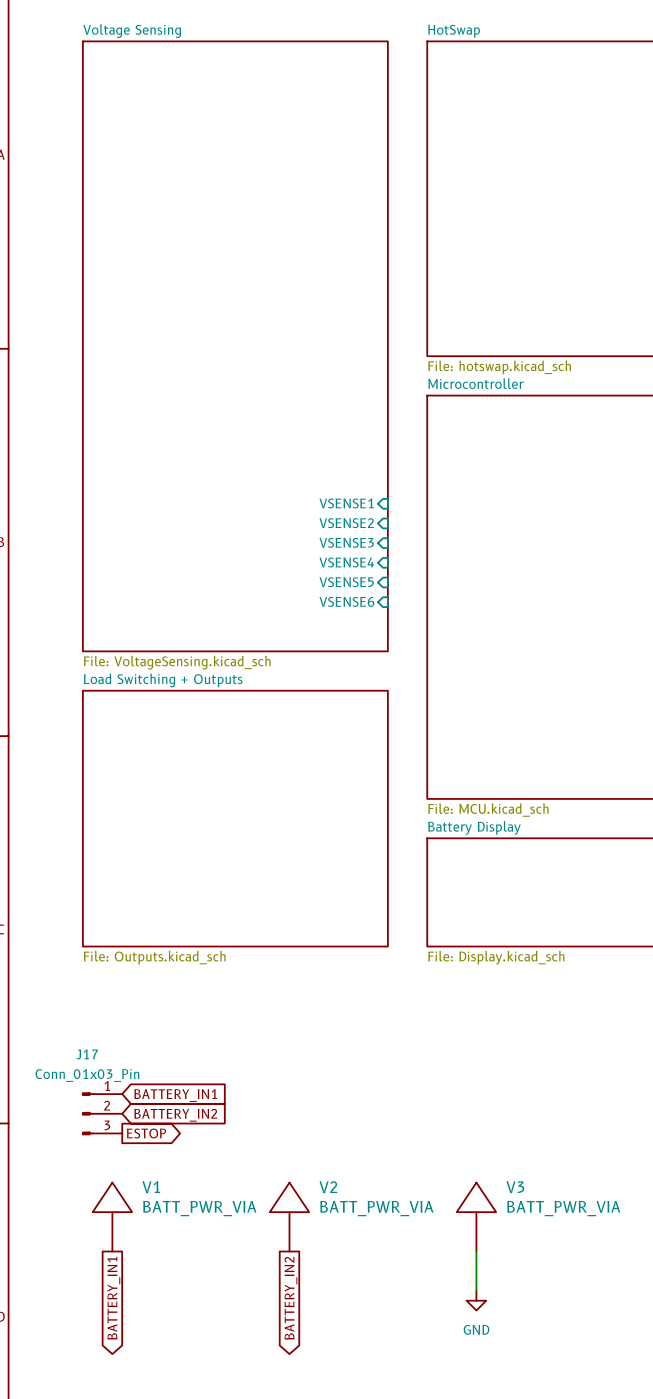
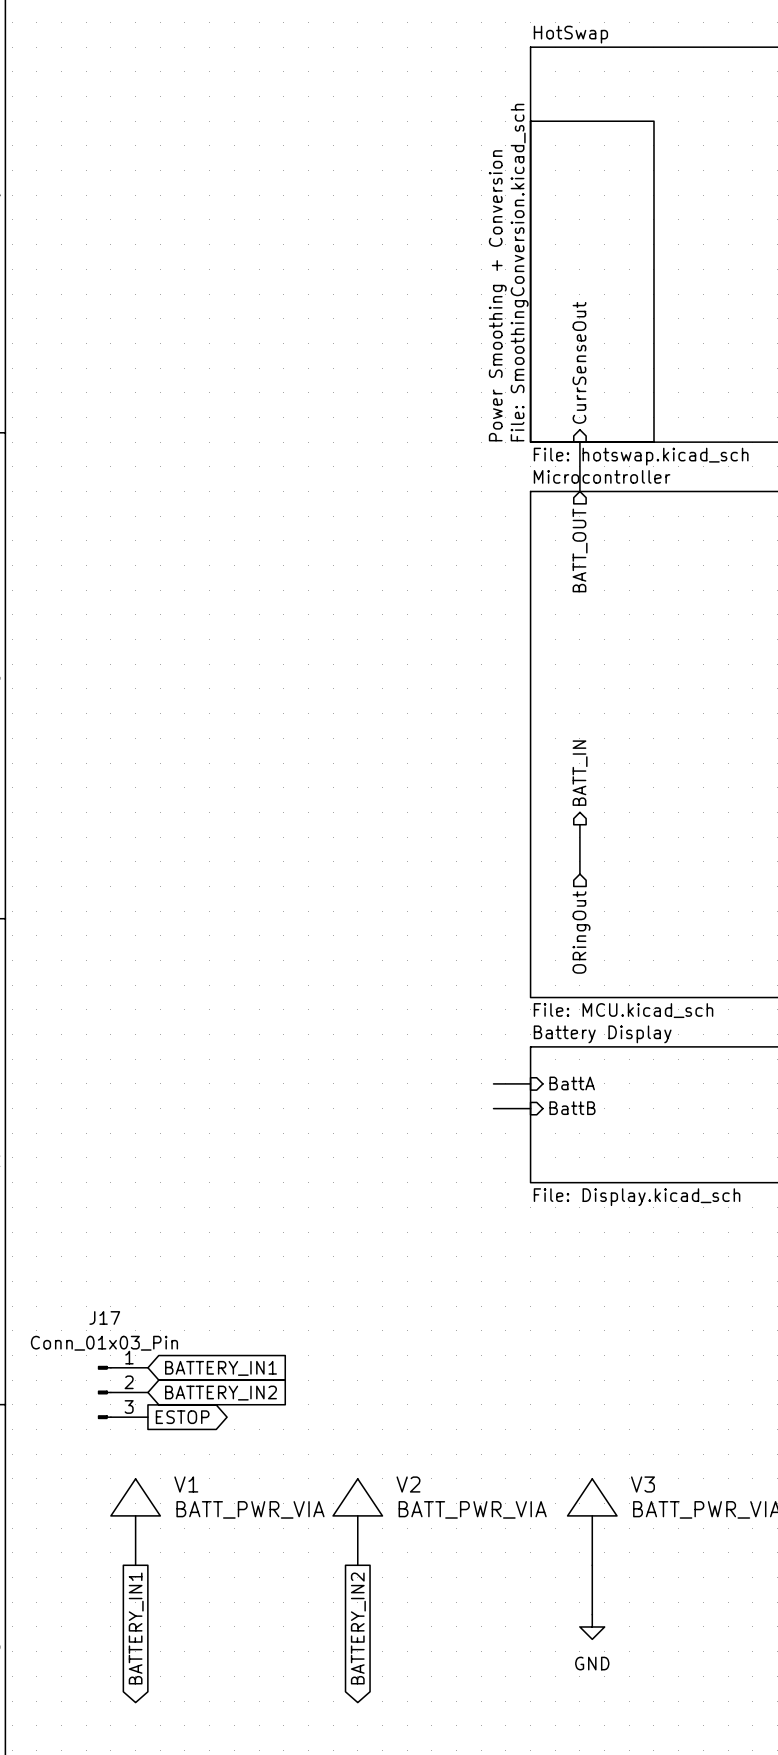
sheet Power Smoothing + Conversion: none -> File: SmoothingConversion.kicad_sch (592, 281)
sheet pin: none -> CurrSenseOut (579, 362)
sheet Voltage Sensing: File: VoltageSensing.kicad_sch (235, 346) -> none
wire: none -> (579, 442) (579, 491)
sheet pin: none -> BATT_OUT (580, 550)
sheet pin: VSENSE1 (346, 503) -> none
sheet pin: VSENSE2 (346, 523) -> none
sheet pin: VSENSE3 (346, 542) -> none
sheet pin: VSENSE4 (346, 562) -> none
sheet pin: VSENSE5 (346, 582) -> none
sheet pin: VSENSE6 (346, 601) -> none
sheet pin: none -> BATT_IN (580, 773)
wire: none -> (579, 824) (579, 874)
sheet pin: none -> ORingOut (581, 932)
sheet Load Switching + Outputs: File: Outputs.kicad_sch (235, 818) -> none
wire: none -> (493, 1083) (530, 1083)
sheet pin: none -> BattA (572, 1083)
wire: none -> (493, 1108) (530, 1108)
sheet pin: none -> BattB (572, 1108)

